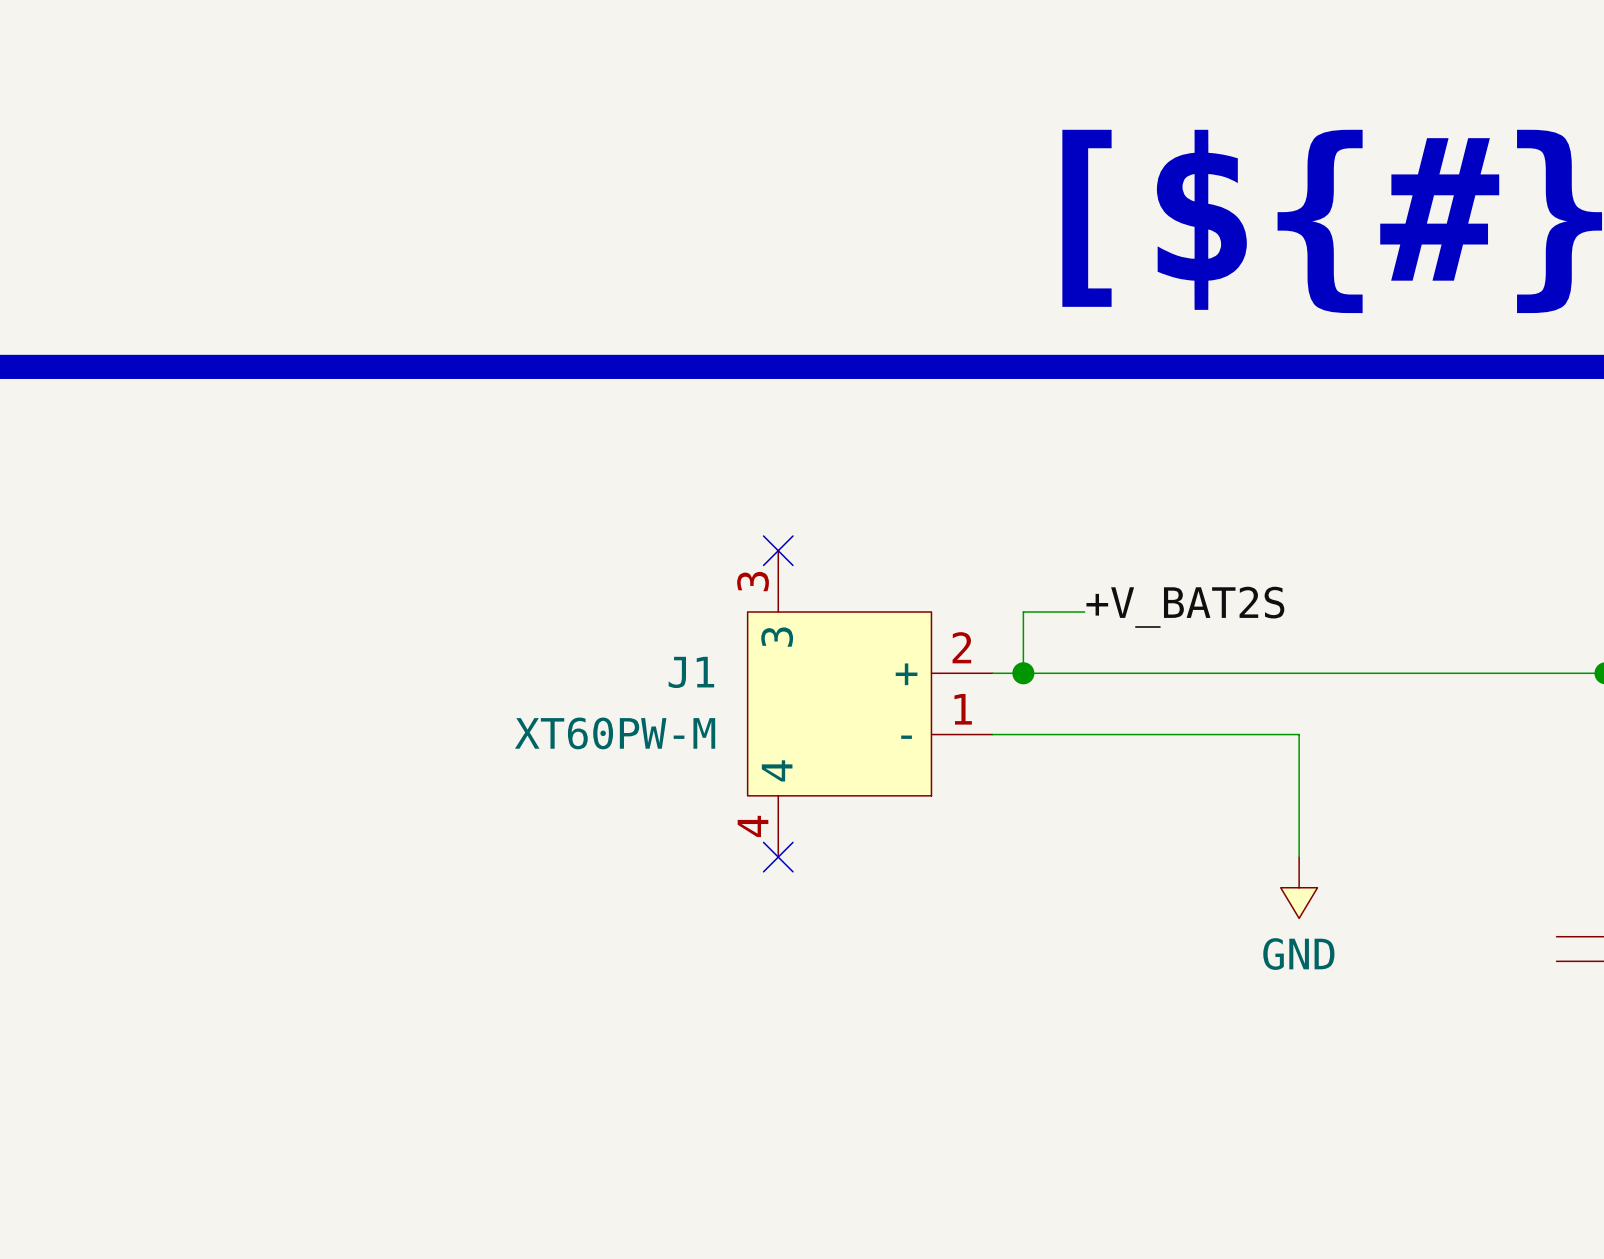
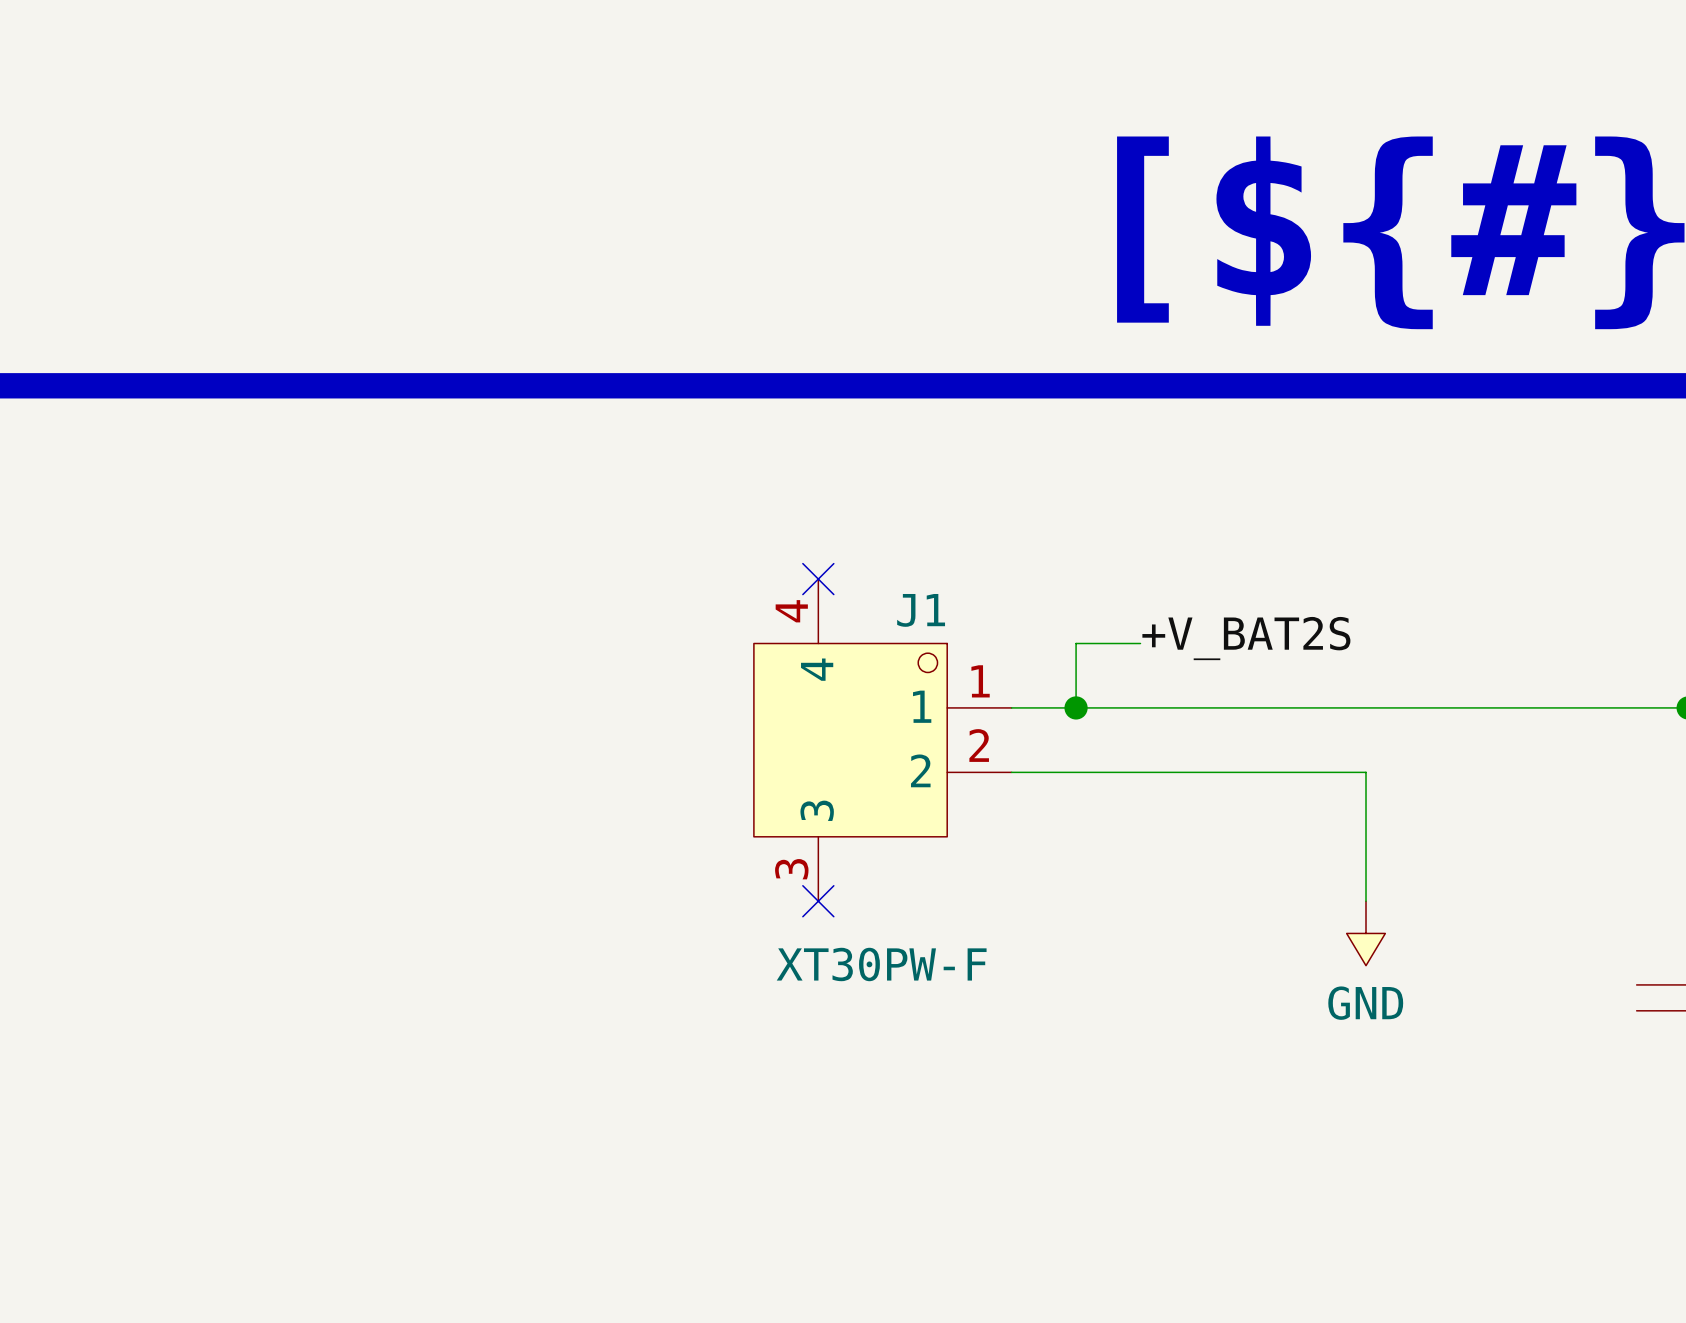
J1 symbol: [747, 550, 993, 858] -> [753, 579, 1012, 902]
J1 name position: J1 (691, 672) -> J1 (921, 610)
J1 value: XT60PW-M (615, 733) -> XT30PW-F (881, 964)

